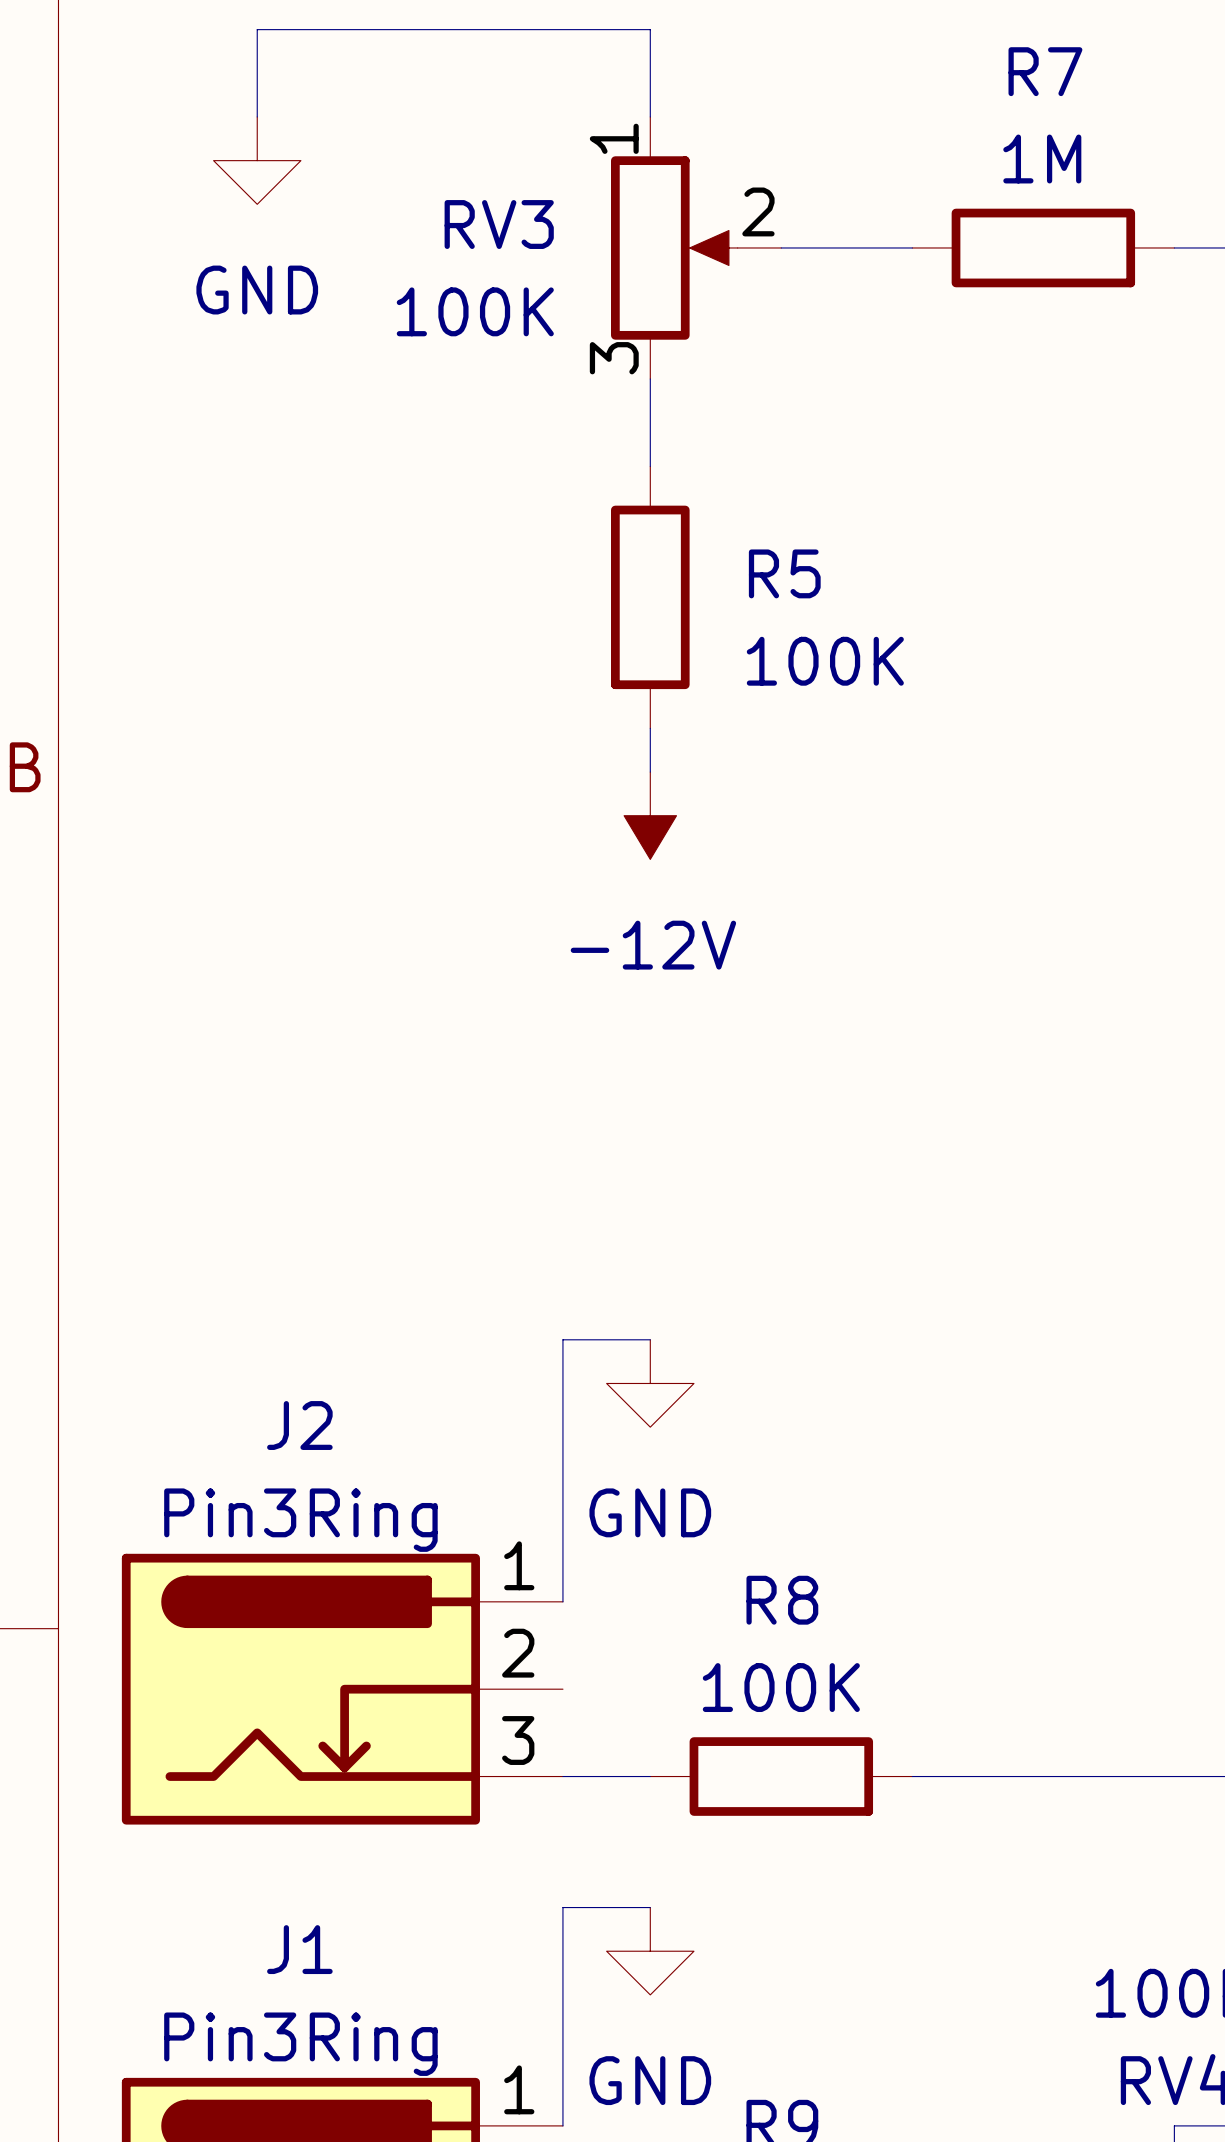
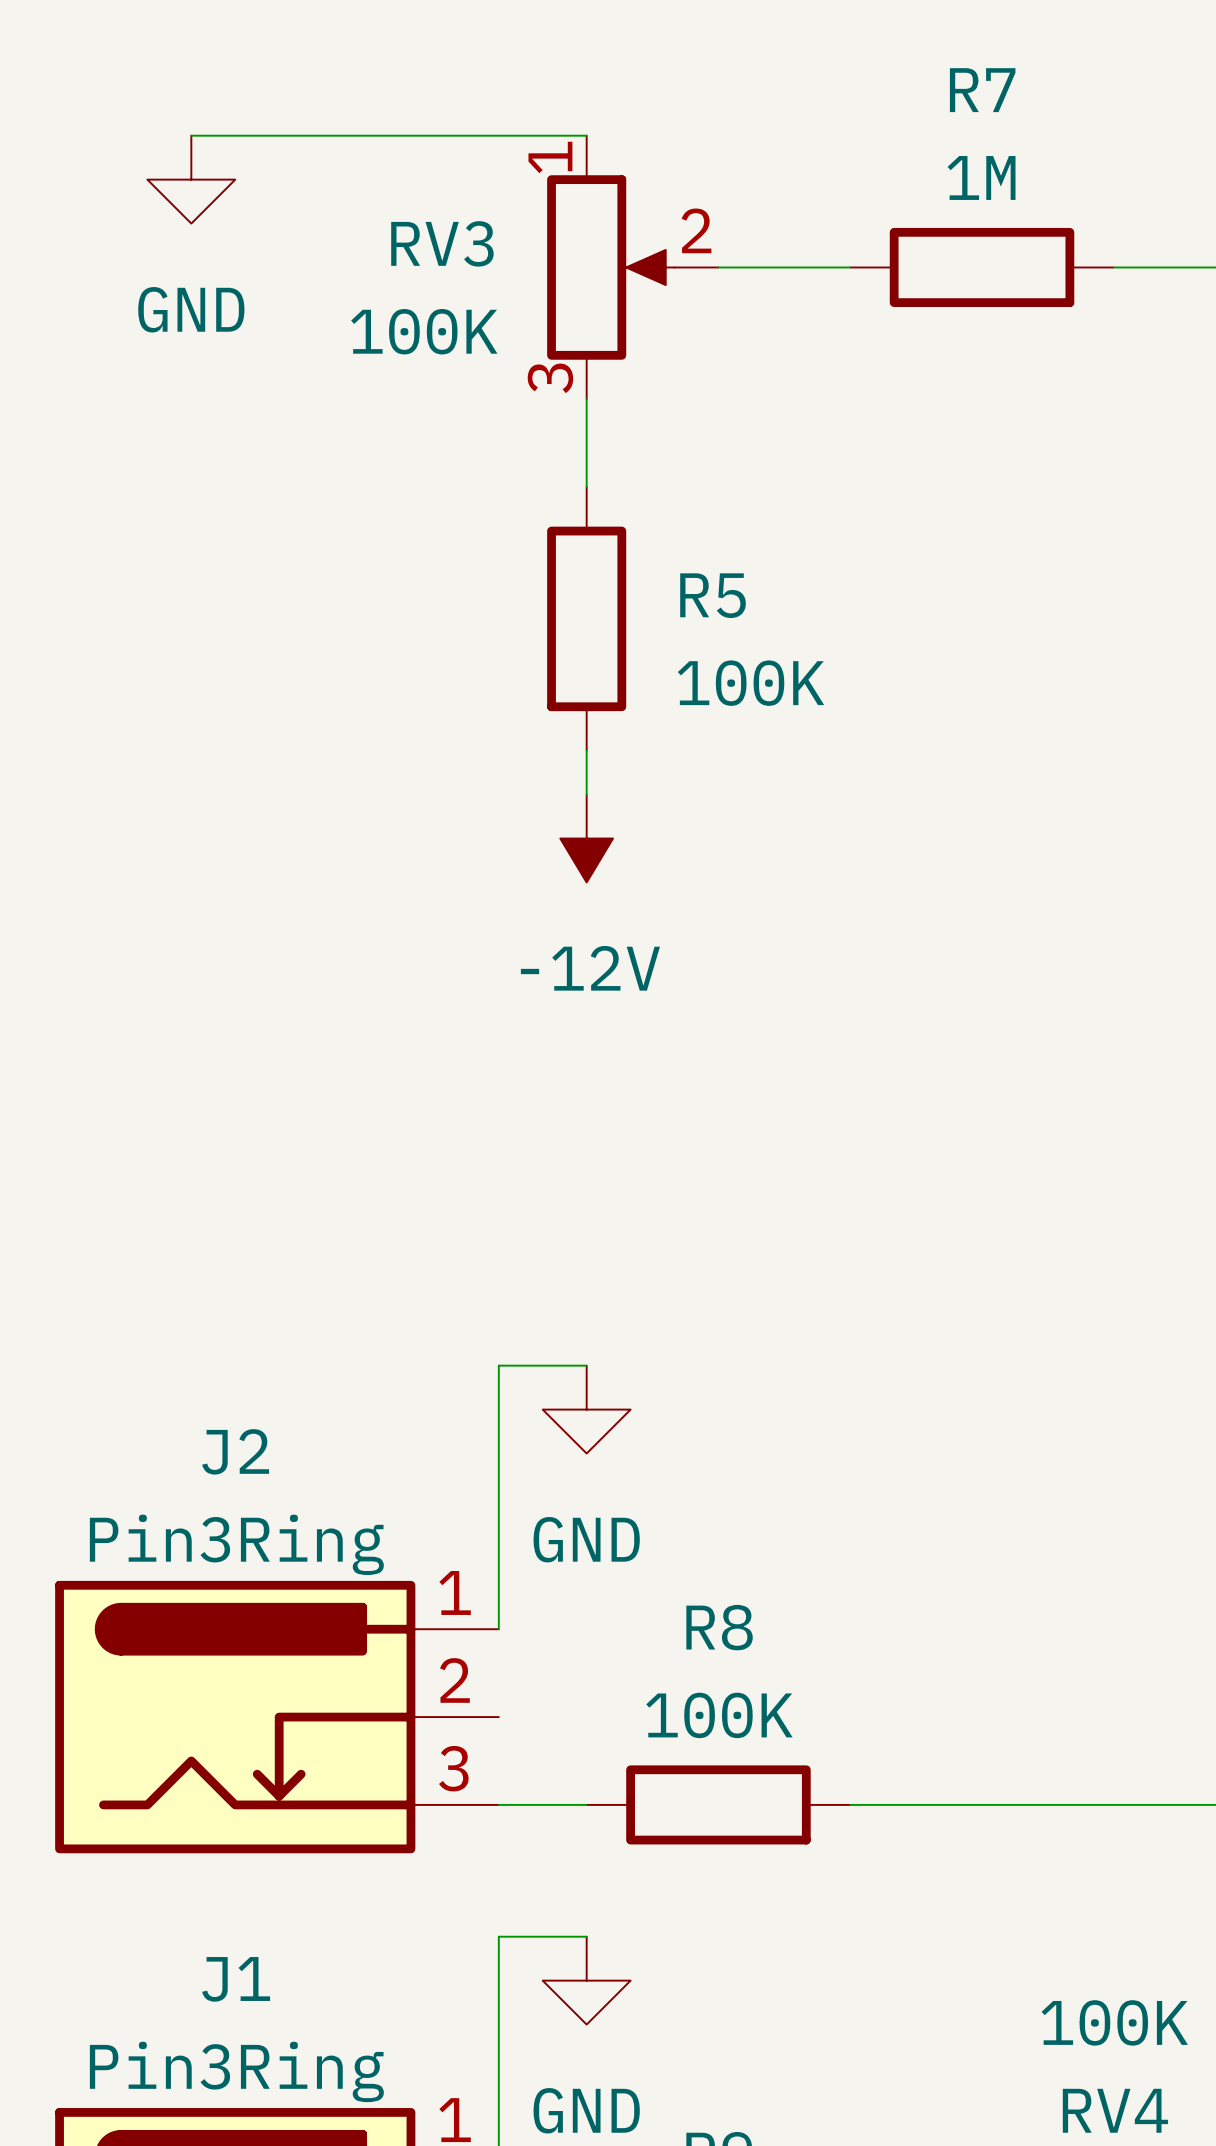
wire: (257, 116) (257, 29) (650, 29) (650, 116) -> (191, 135) (586, 135)

